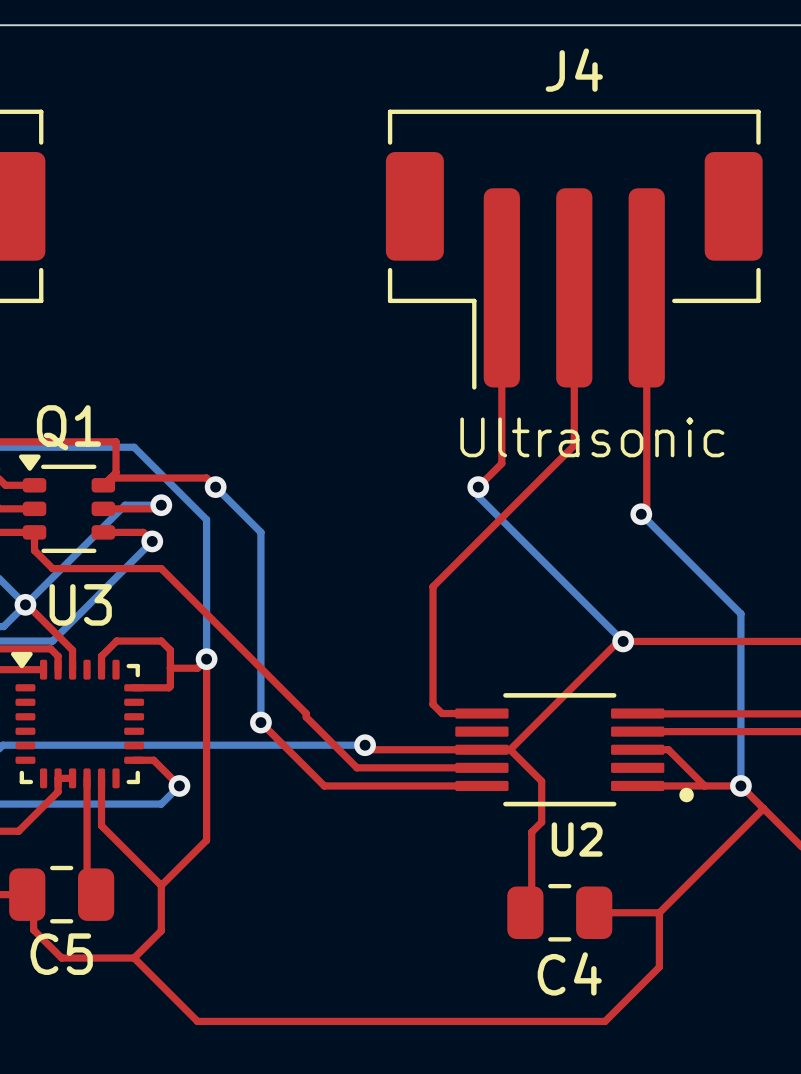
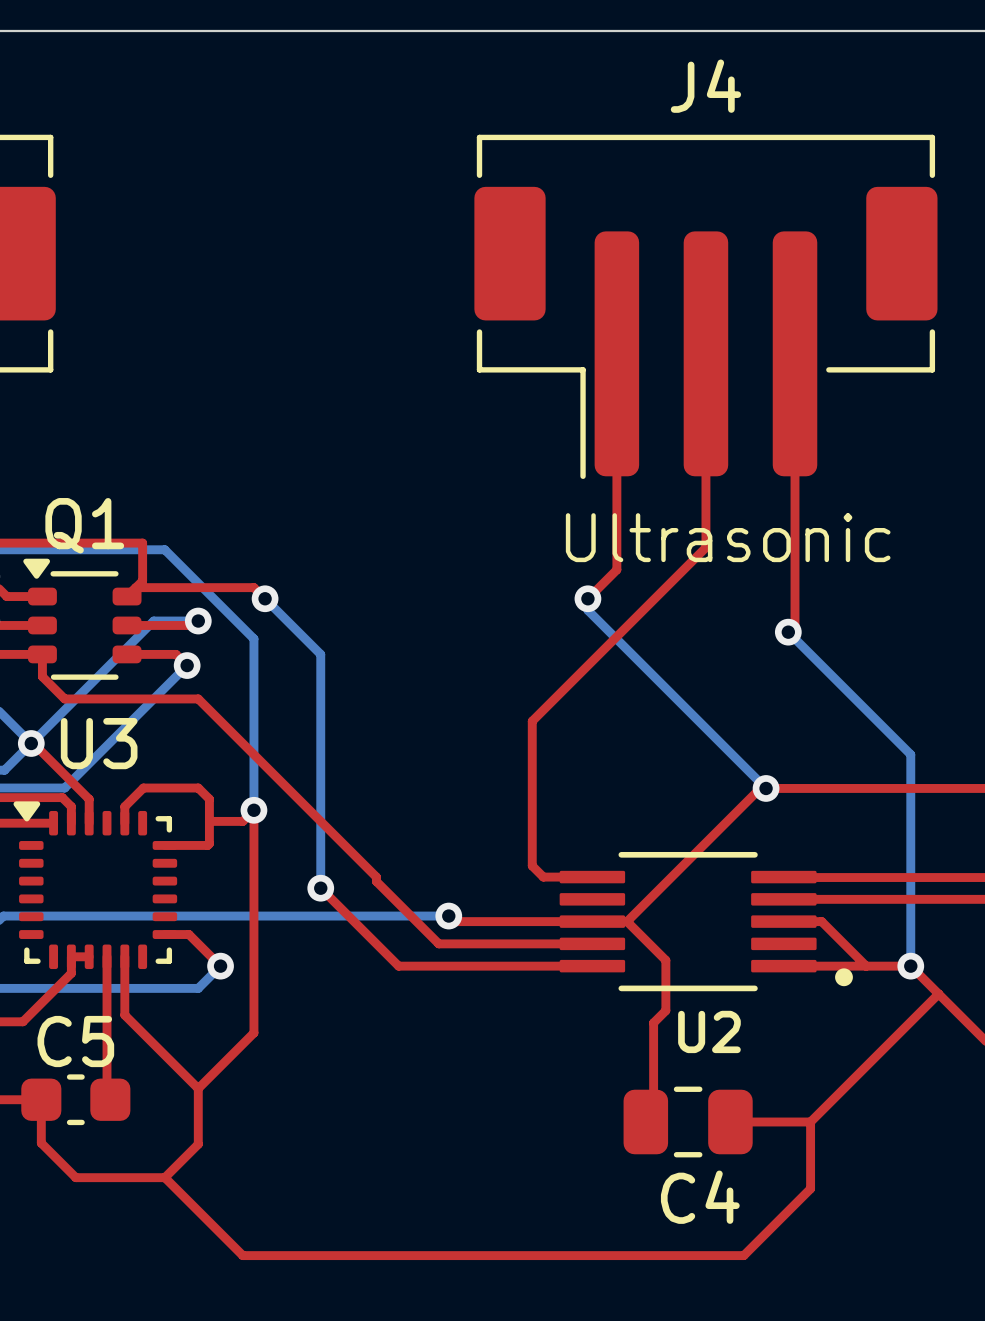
C5 footprint: [9, 865, 115, 924] -> [21, 1074, 131, 1126]
C5 name position: C5 (61, 954) -> C5 (75, 1041)

